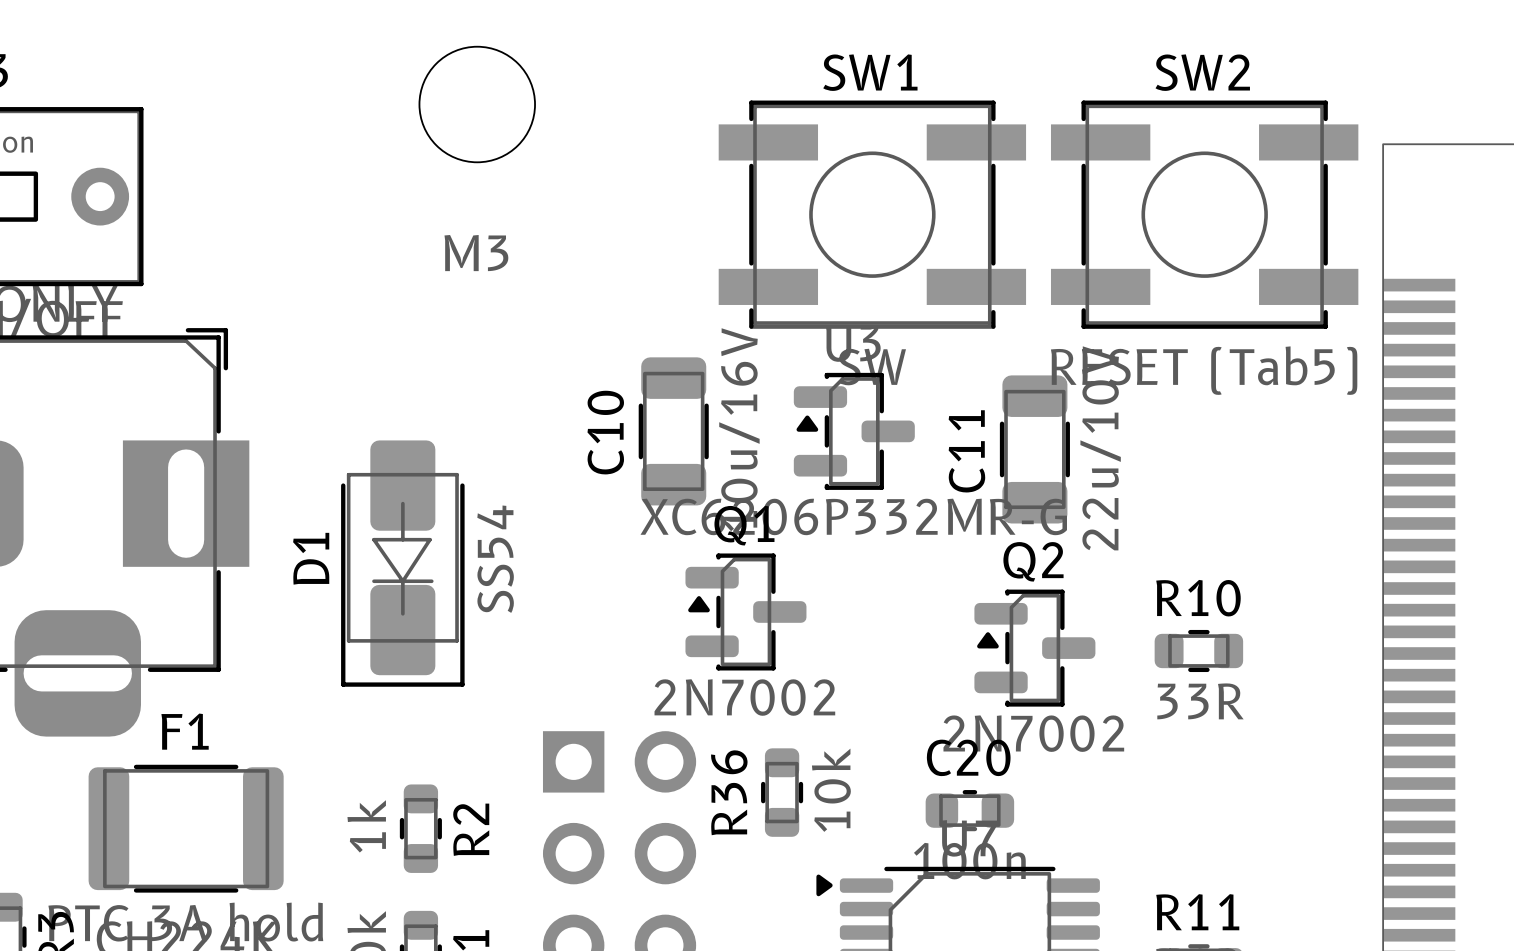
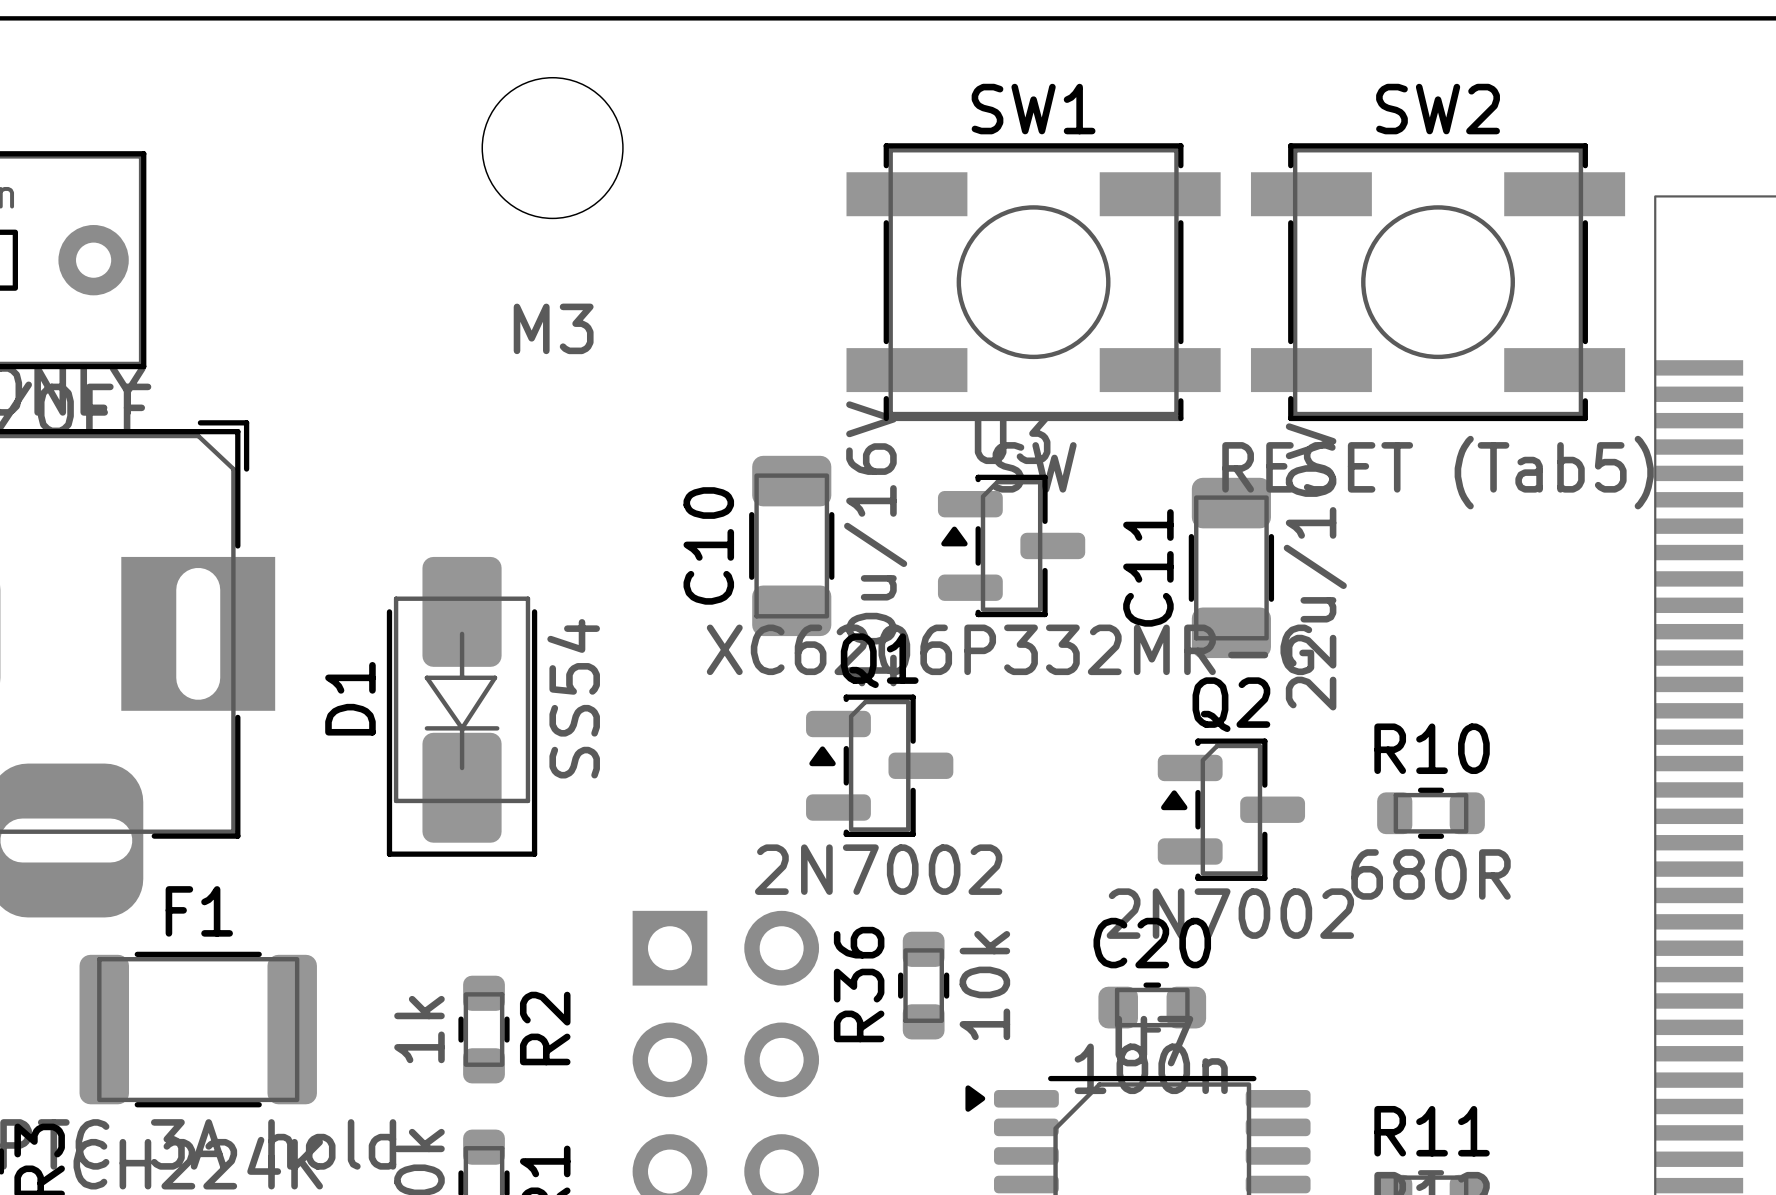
R10 value: 33R (1200, 701) -> 680R (1431, 874)

